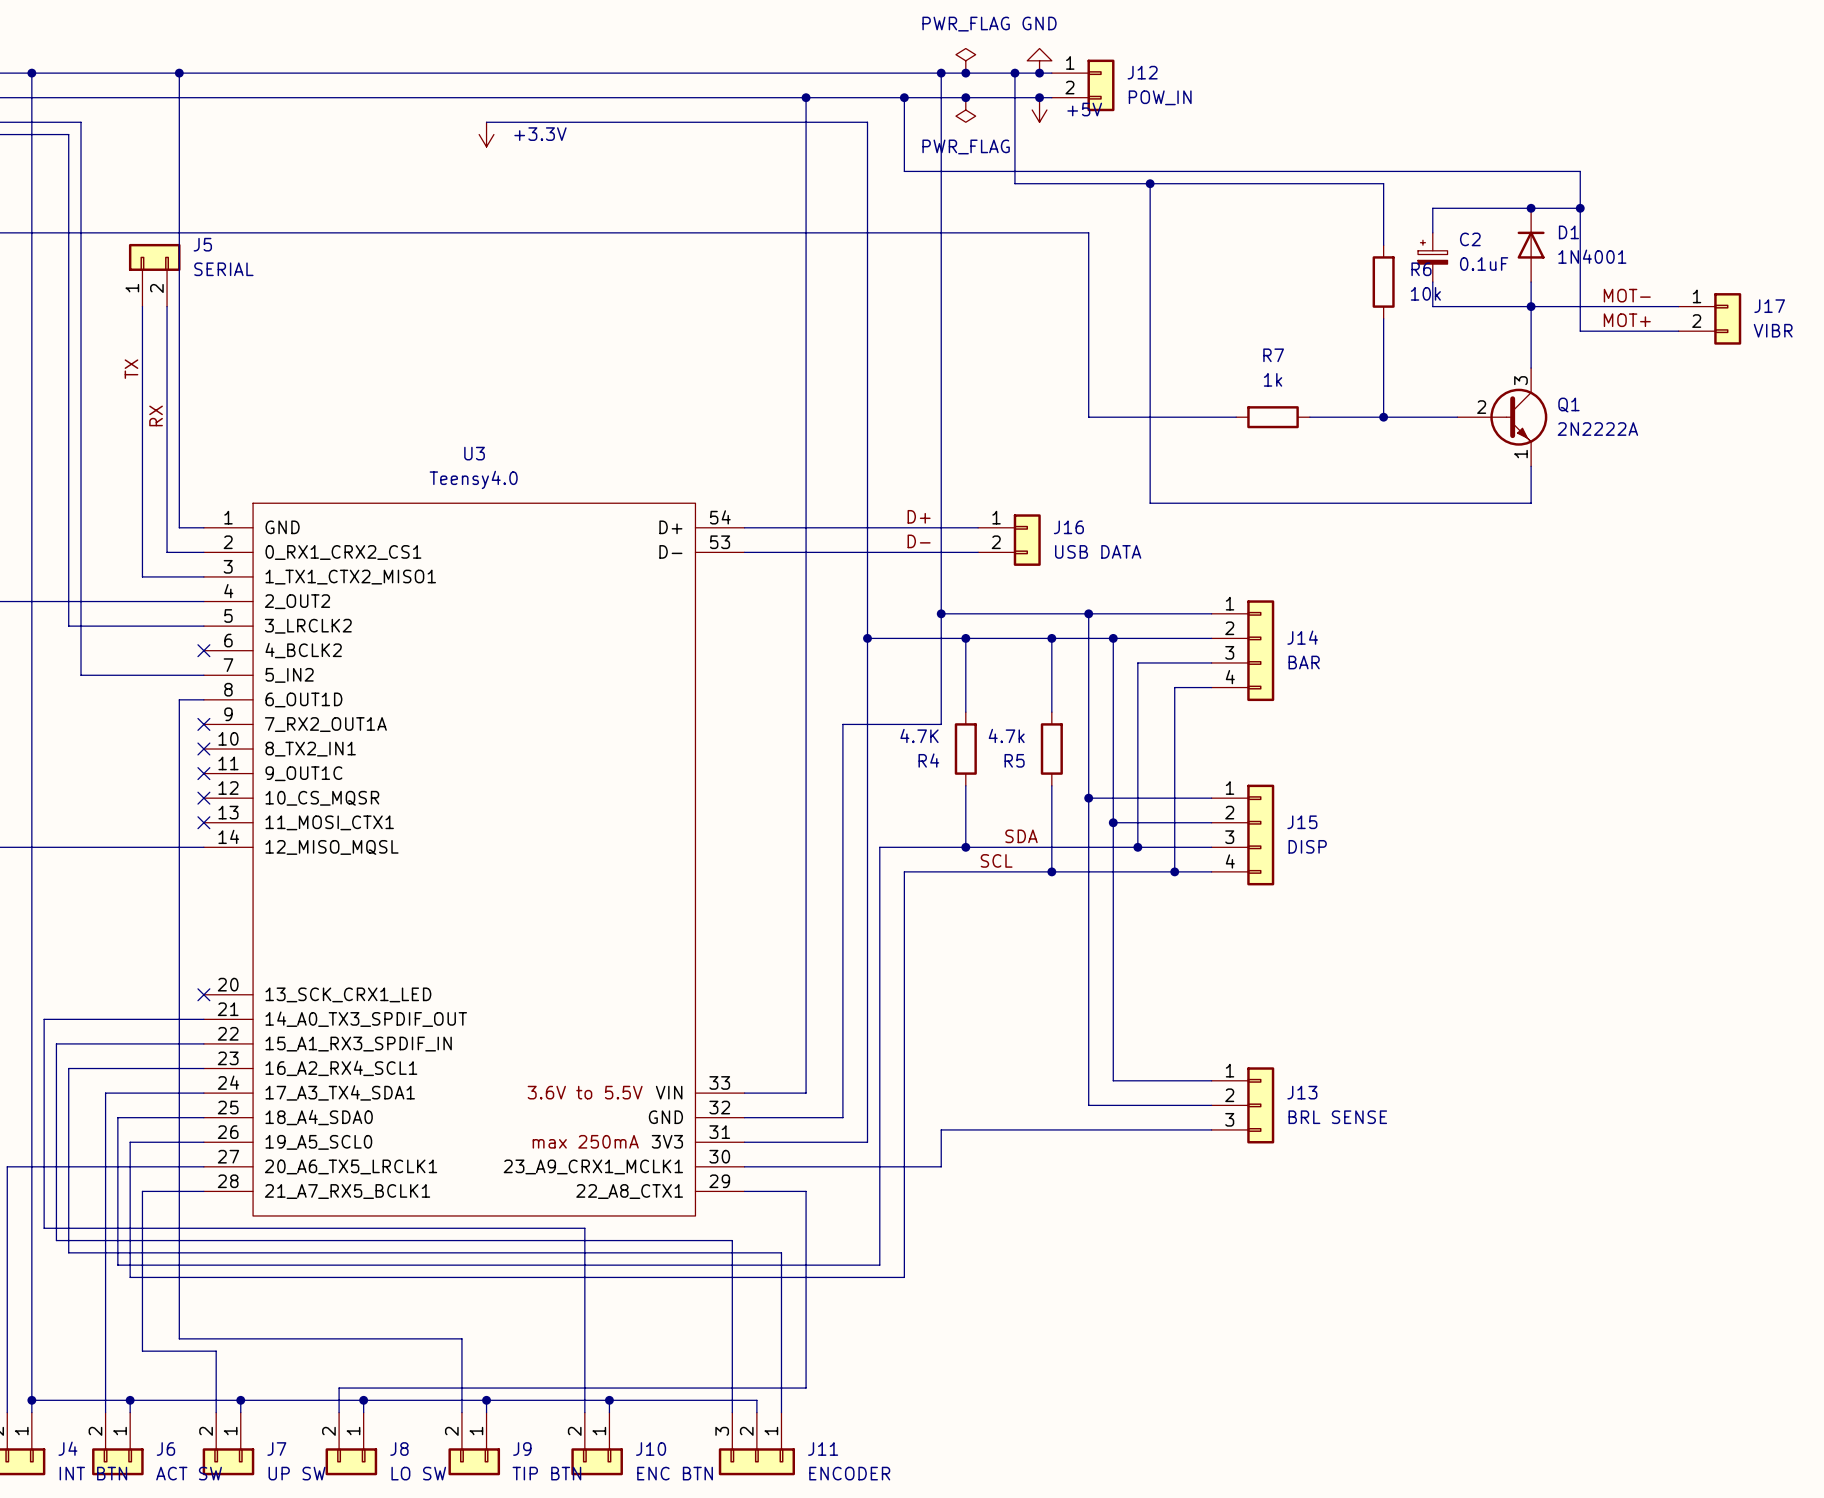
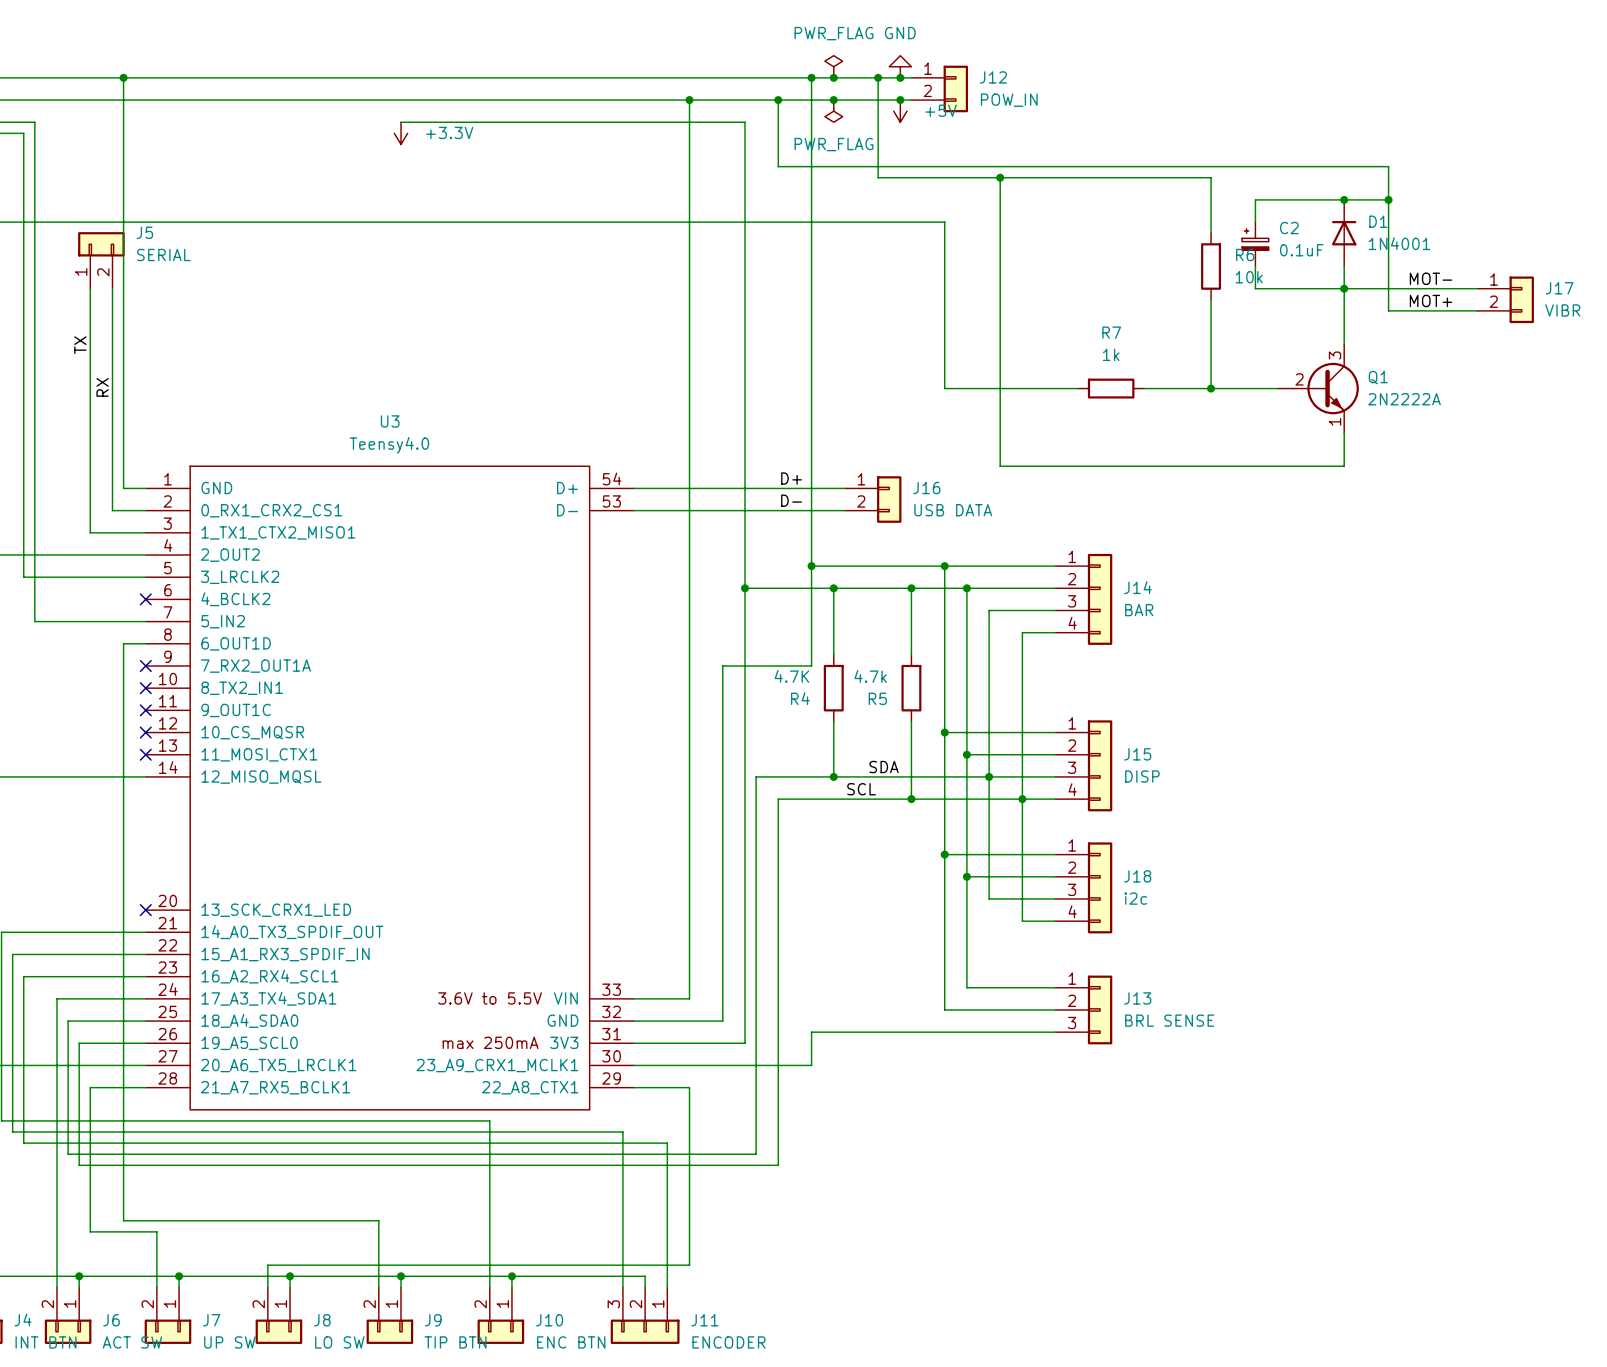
wire: none -> (989, 776) (989, 899) (1055, 899)
wire: none -> (1022, 799) (1022, 921) (1055, 921)
wire: none -> (944, 854) (1055, 854)
junction: none -> (944, 854)
wire: none -> (966, 876) (1055, 876)
junction: none -> (966, 876)
J18: none -> i2c (1083, 887)

